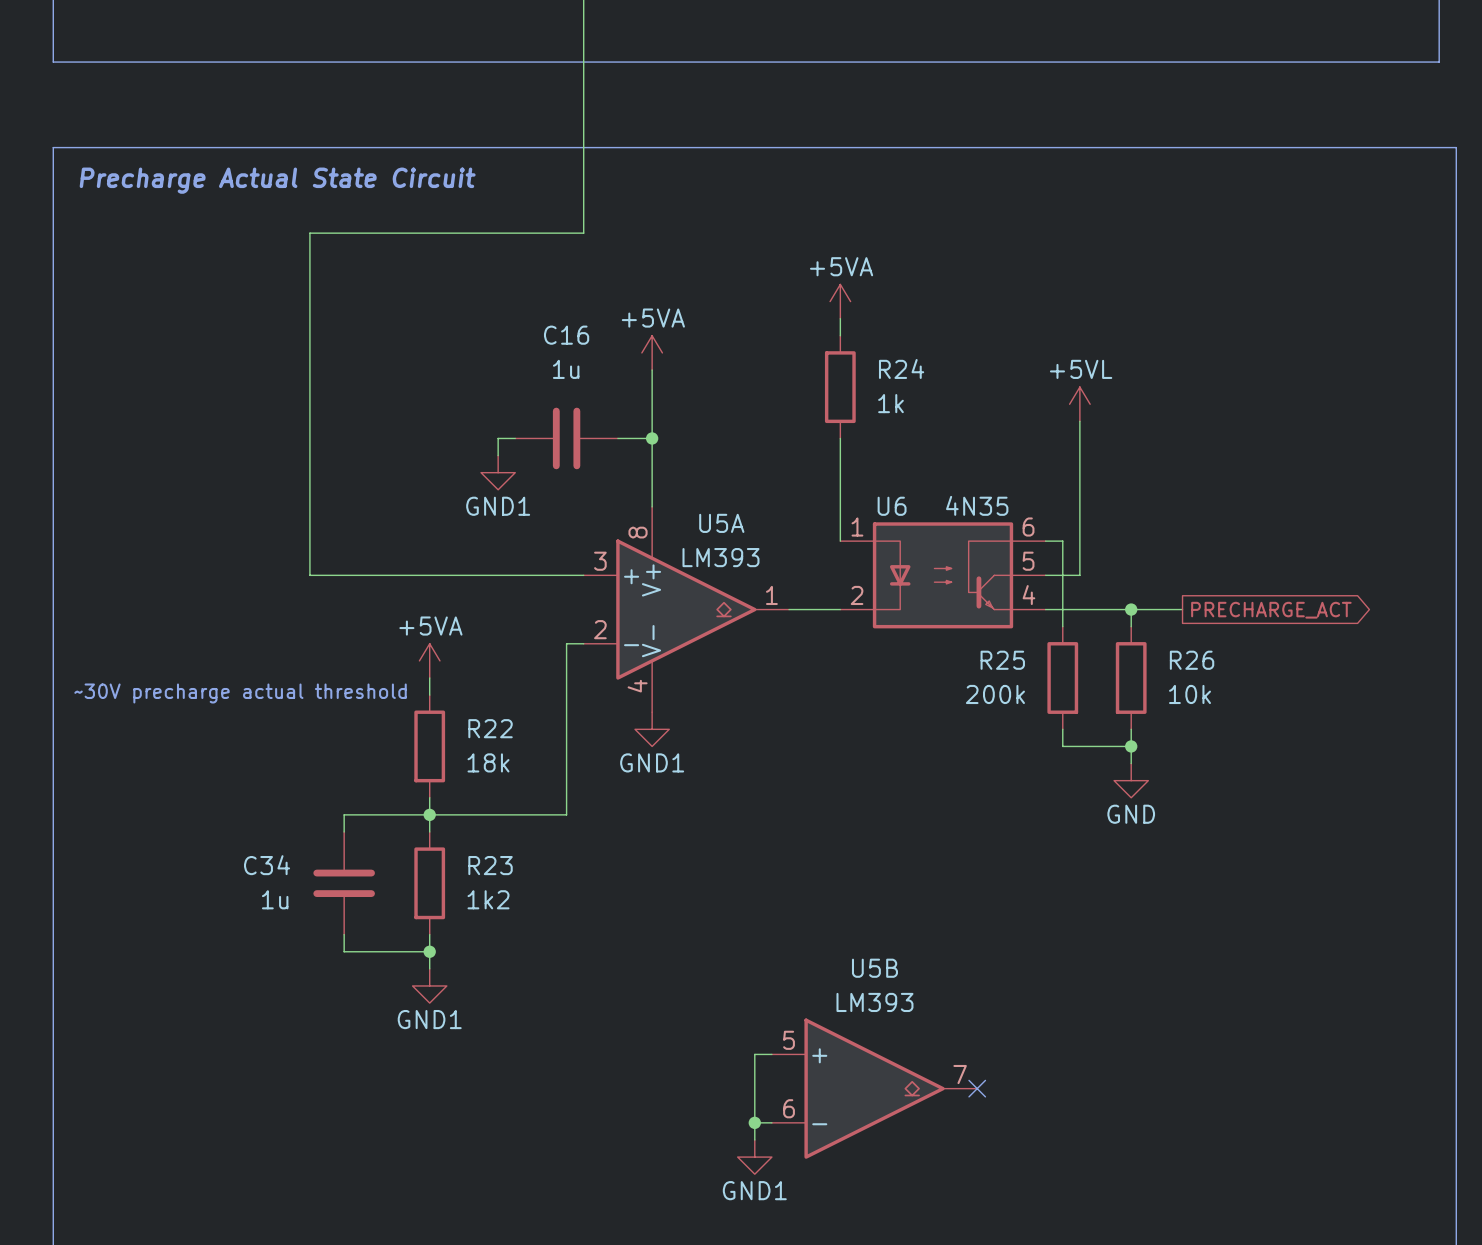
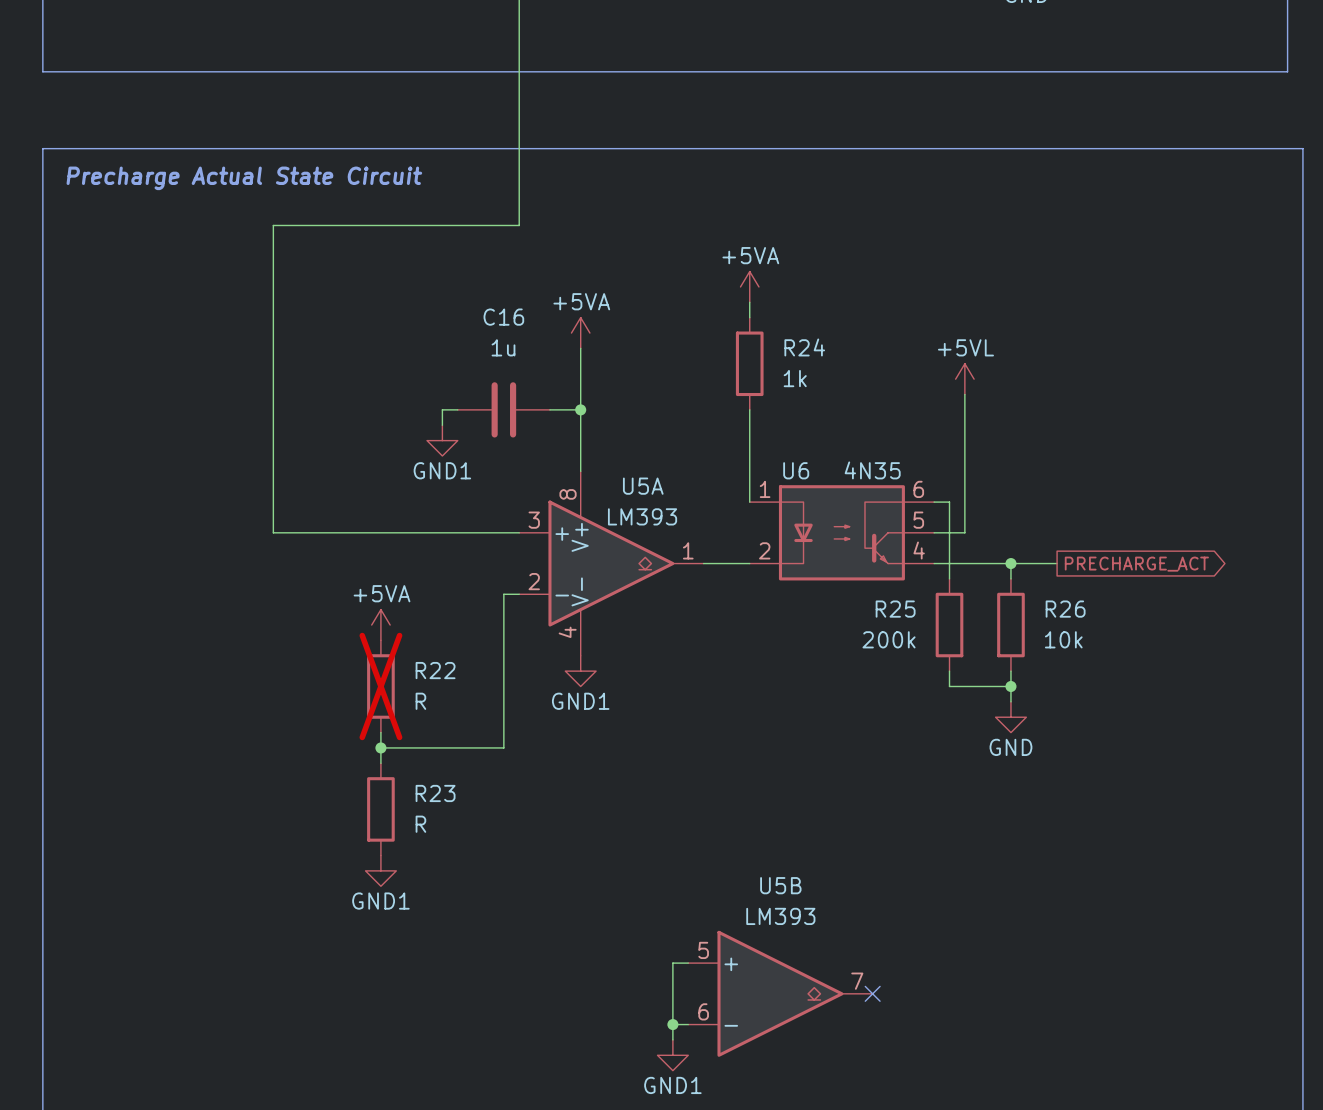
power symbol position: +5VA (429, 660) -> +5VA (380, 625)
text: ~30V precharge actual threshold (240, 693) -> none
R22 do-not-place cross: none -> (380, 686)
R22 value: 18k (488, 762) -> R (420, 701)
wire: (429, 814) (344, 814) (344, 831) -> none
C34: 1u (344, 883) -> none
R23 value: 1k2 (488, 899) -> R (420, 824)
wire: (344, 934) (344, 951) (429, 951) -> none
junction: (429, 951) -> none
power symbol position: GND1 (429, 985) -> GND1 (380, 870)

